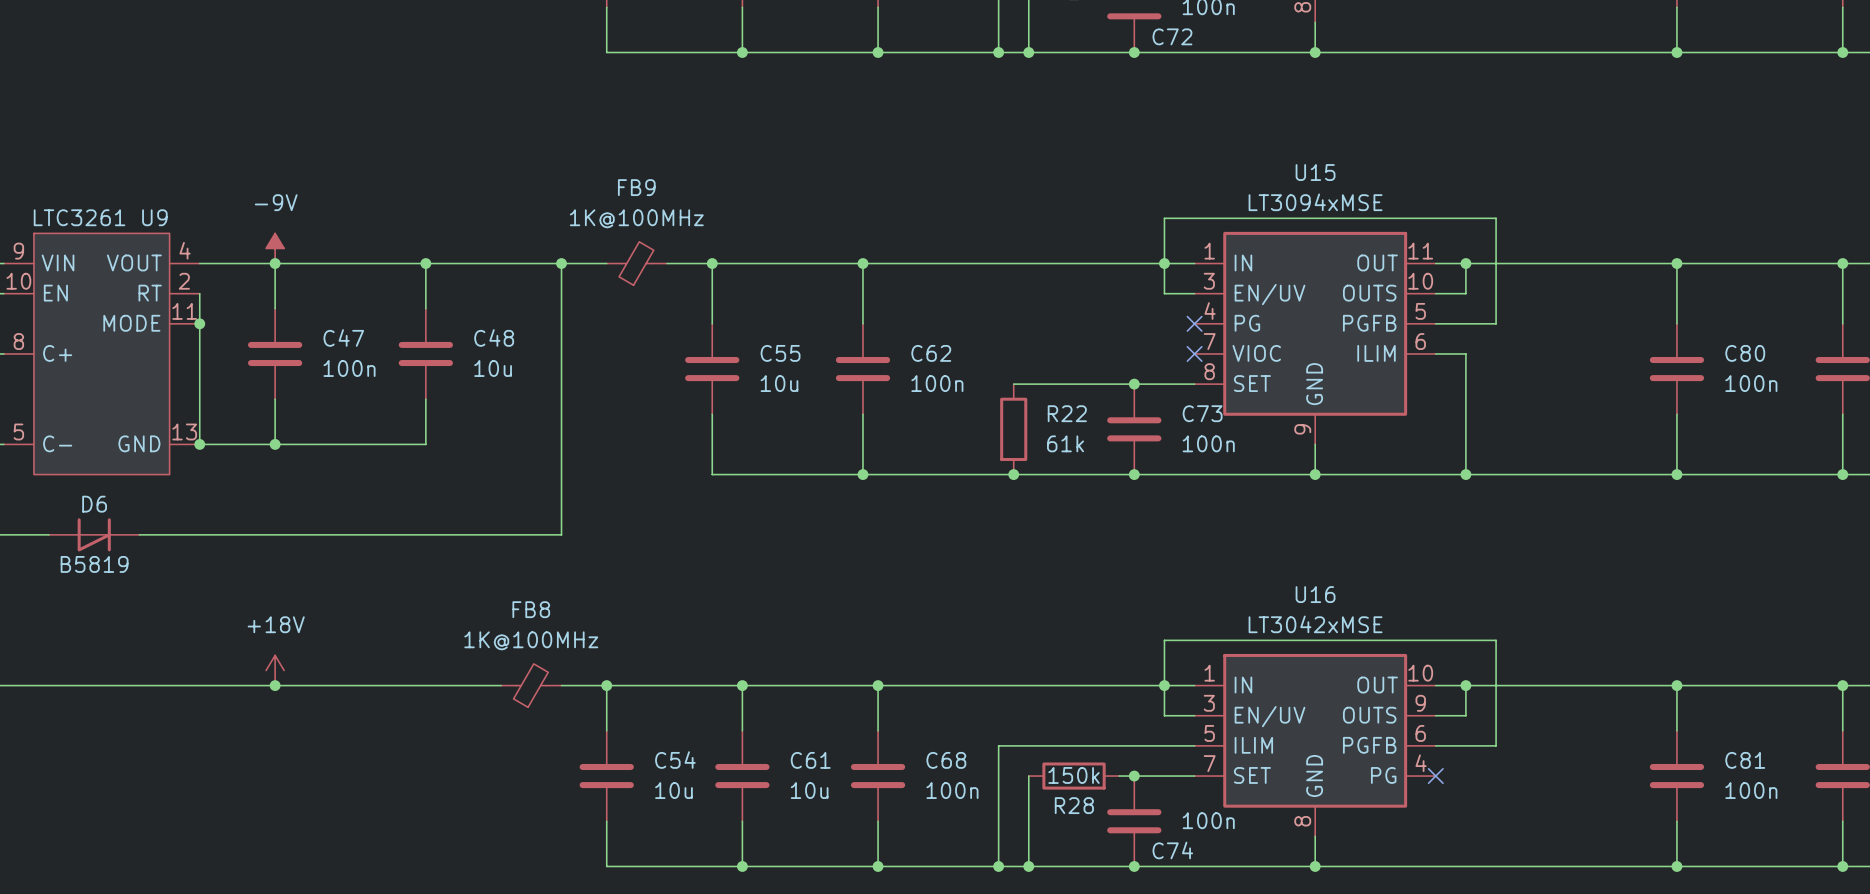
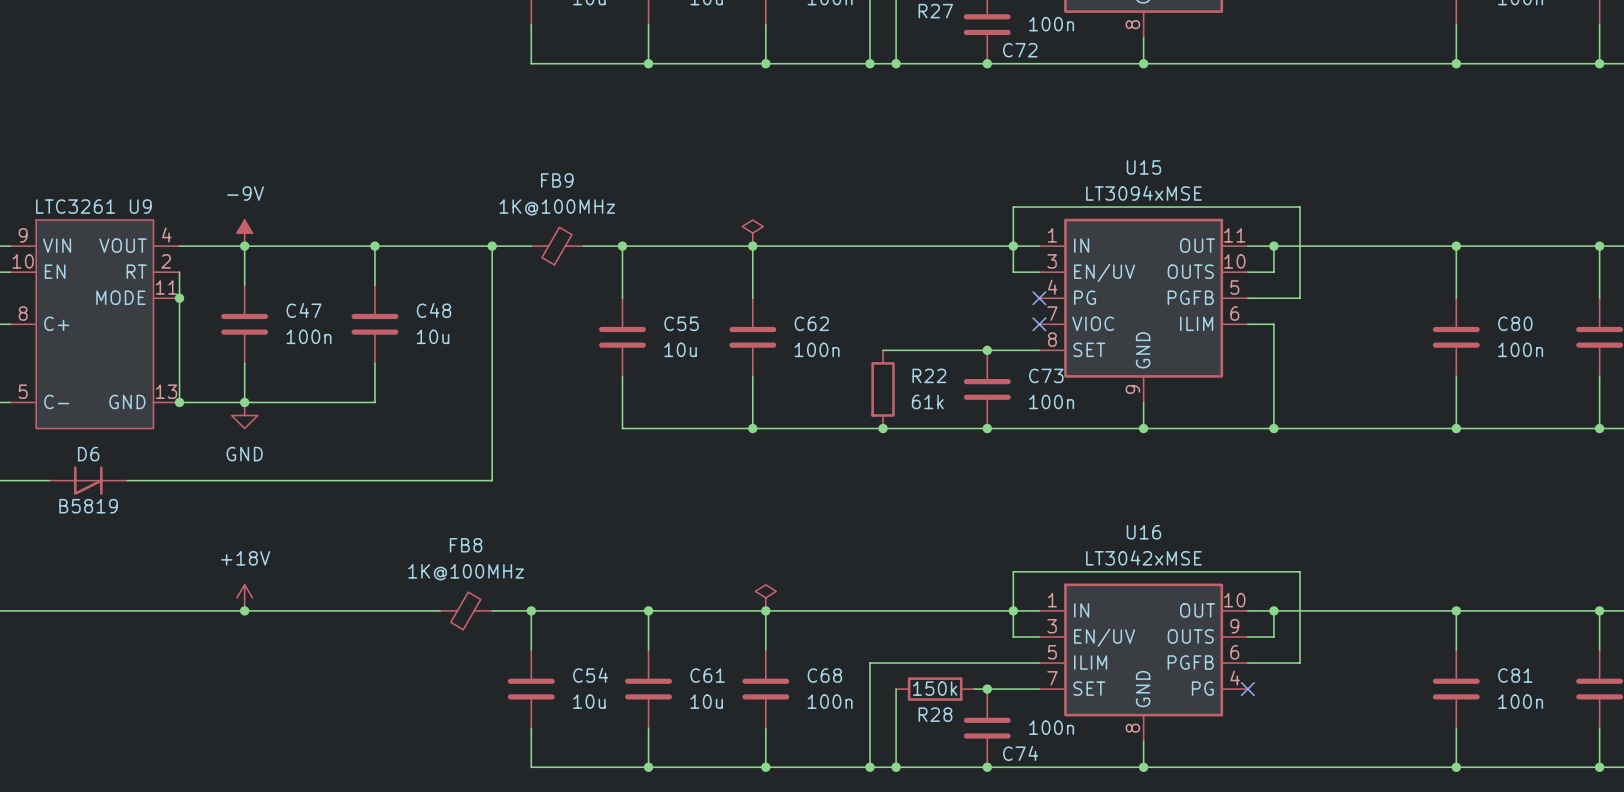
power symbol: none -> (752, 233)
power symbol: none -> GND (244, 415)
power symbol: none -> (765, 597)

